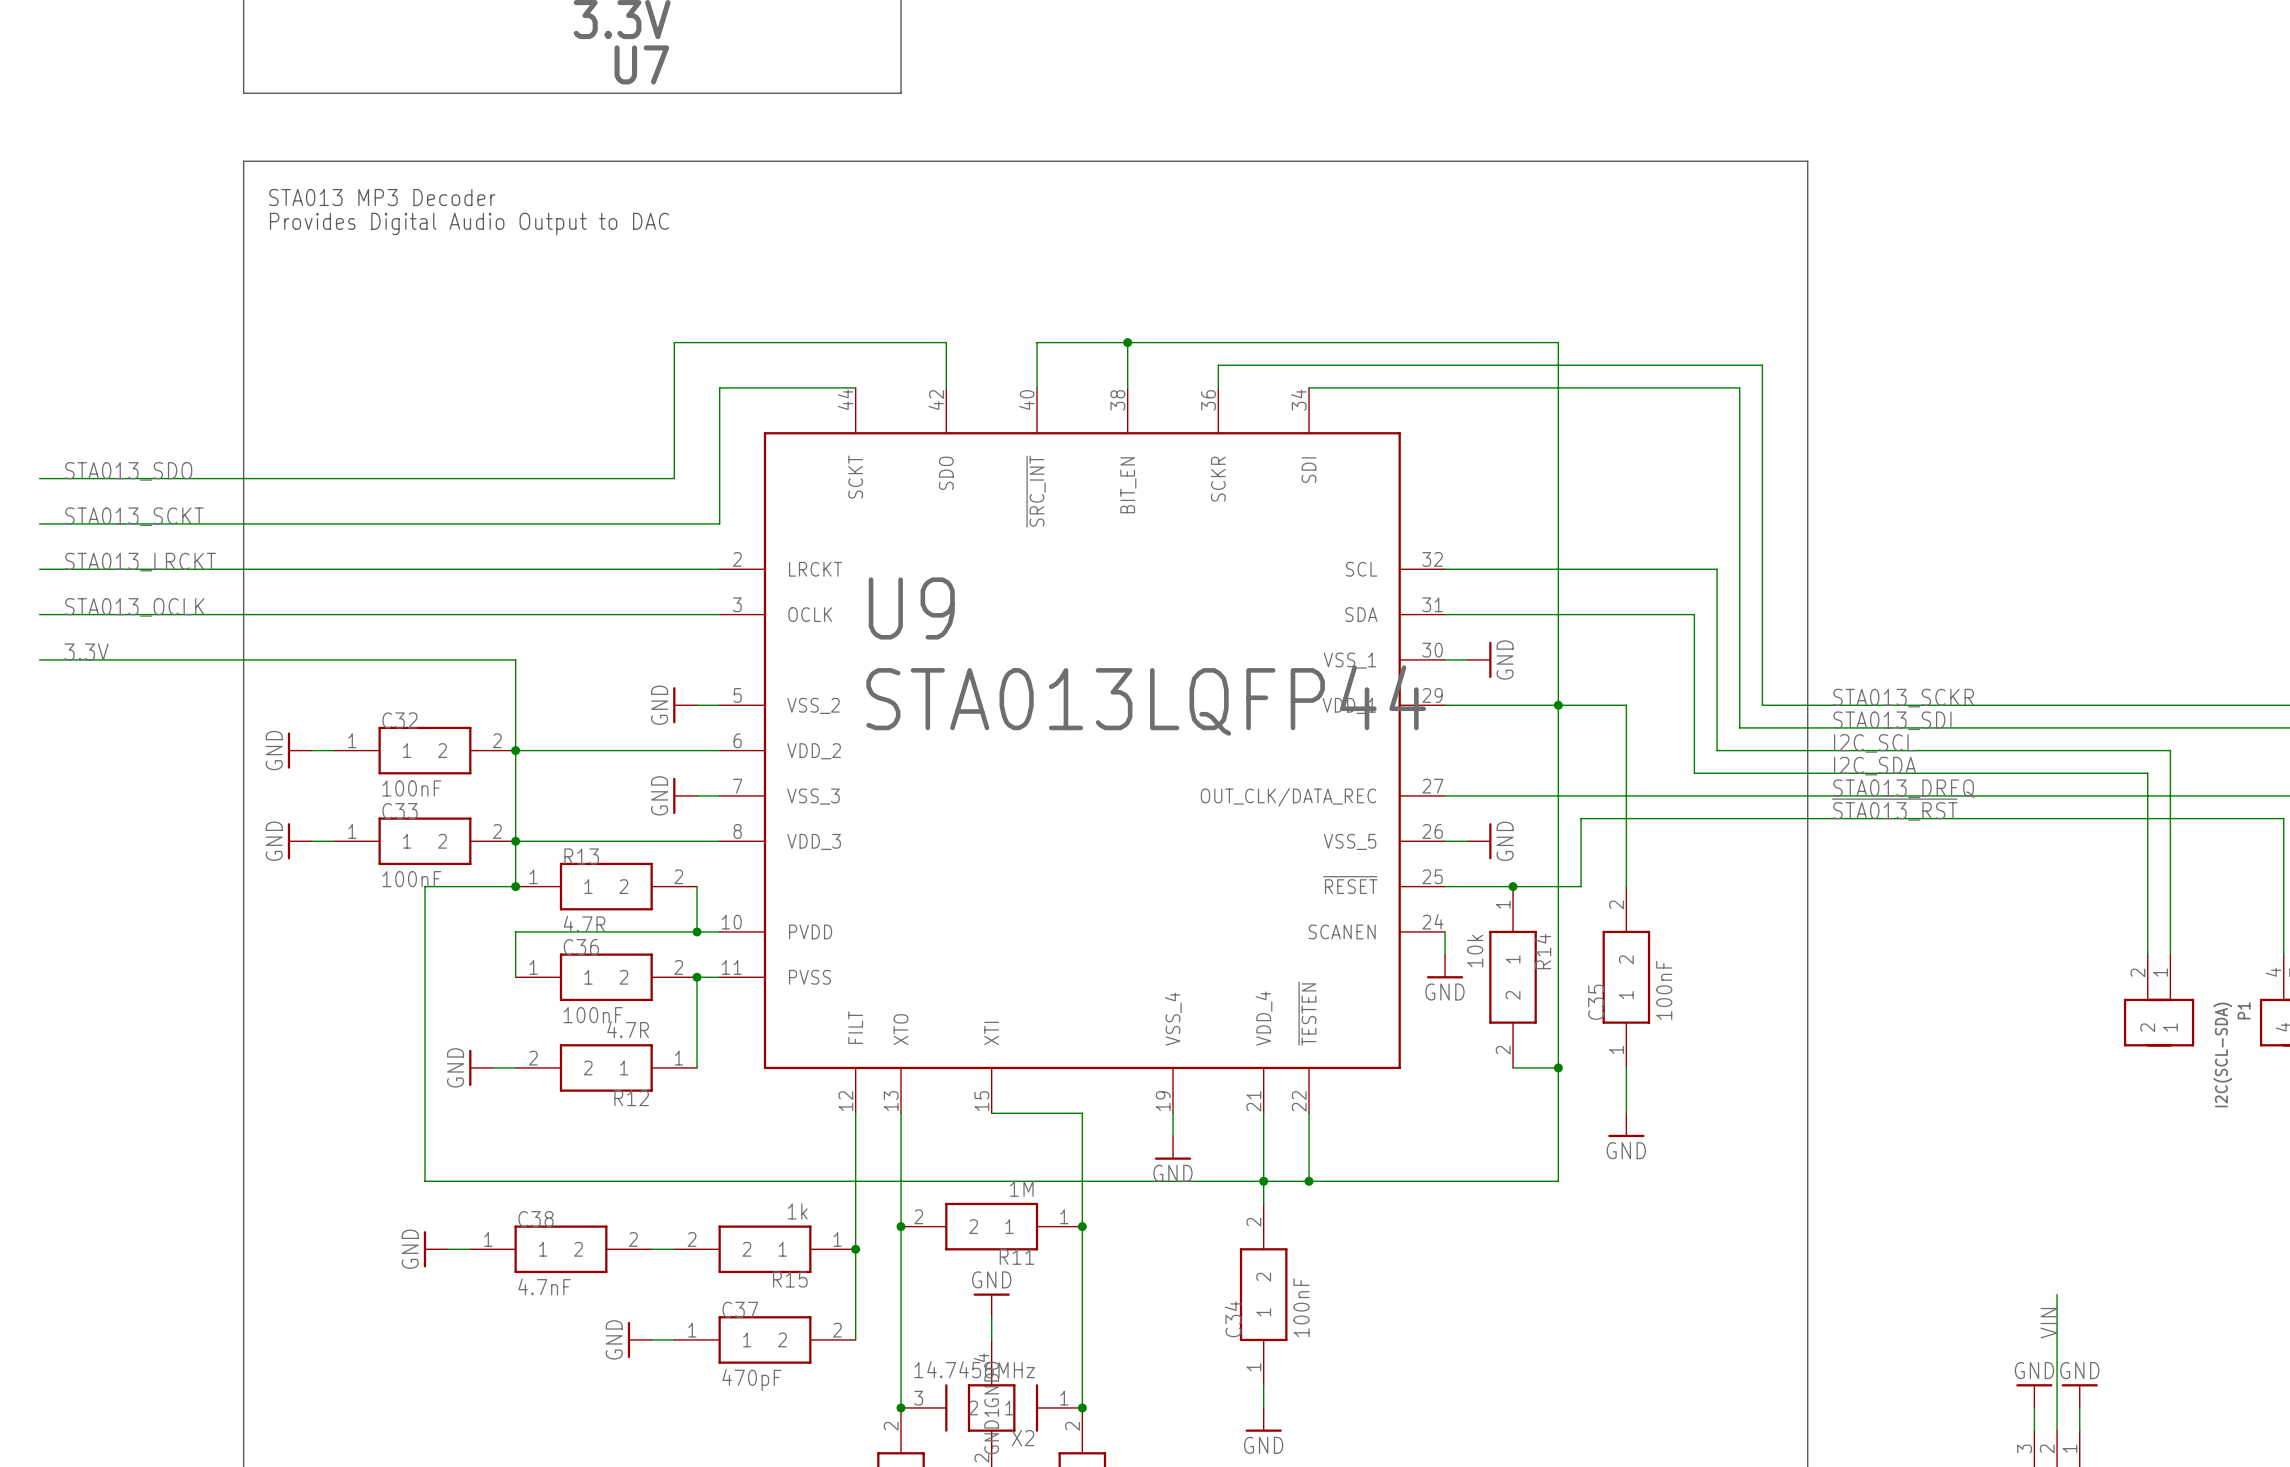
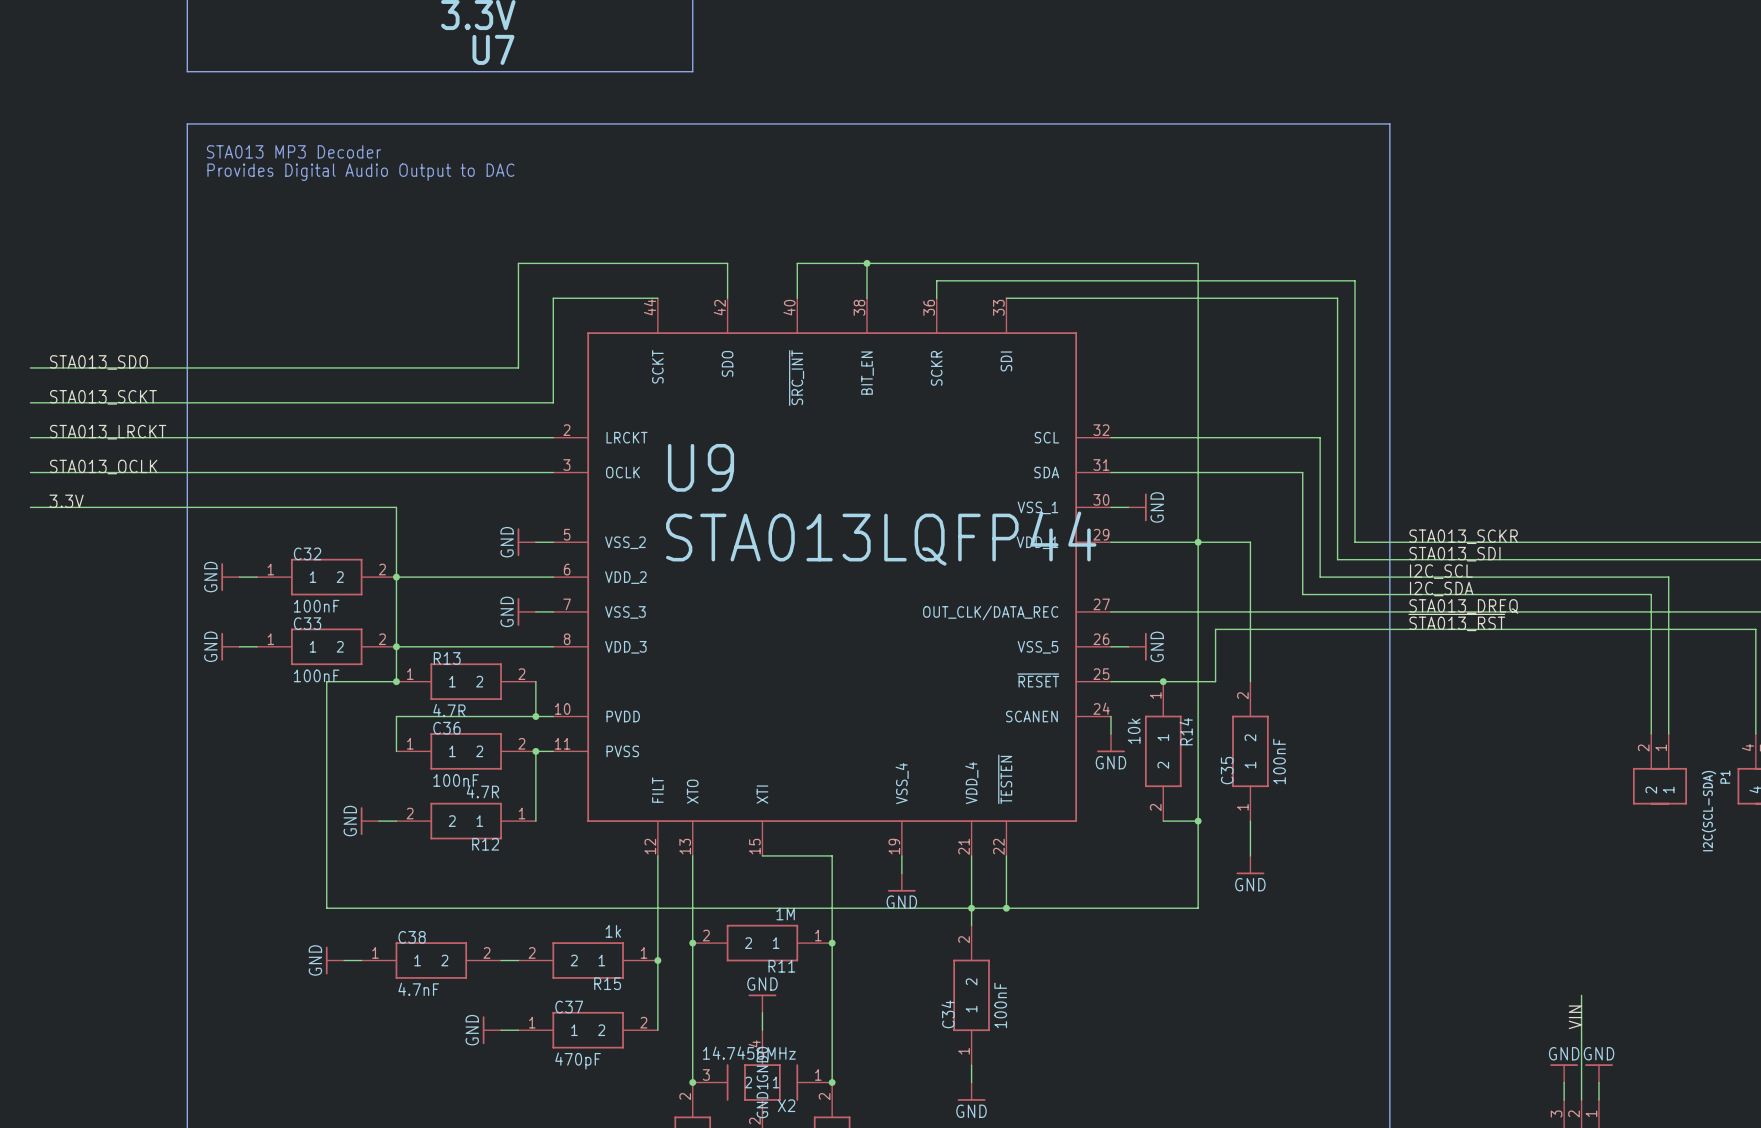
U9 pin number: 34 (1298, 400) -> 33 (998, 307)

